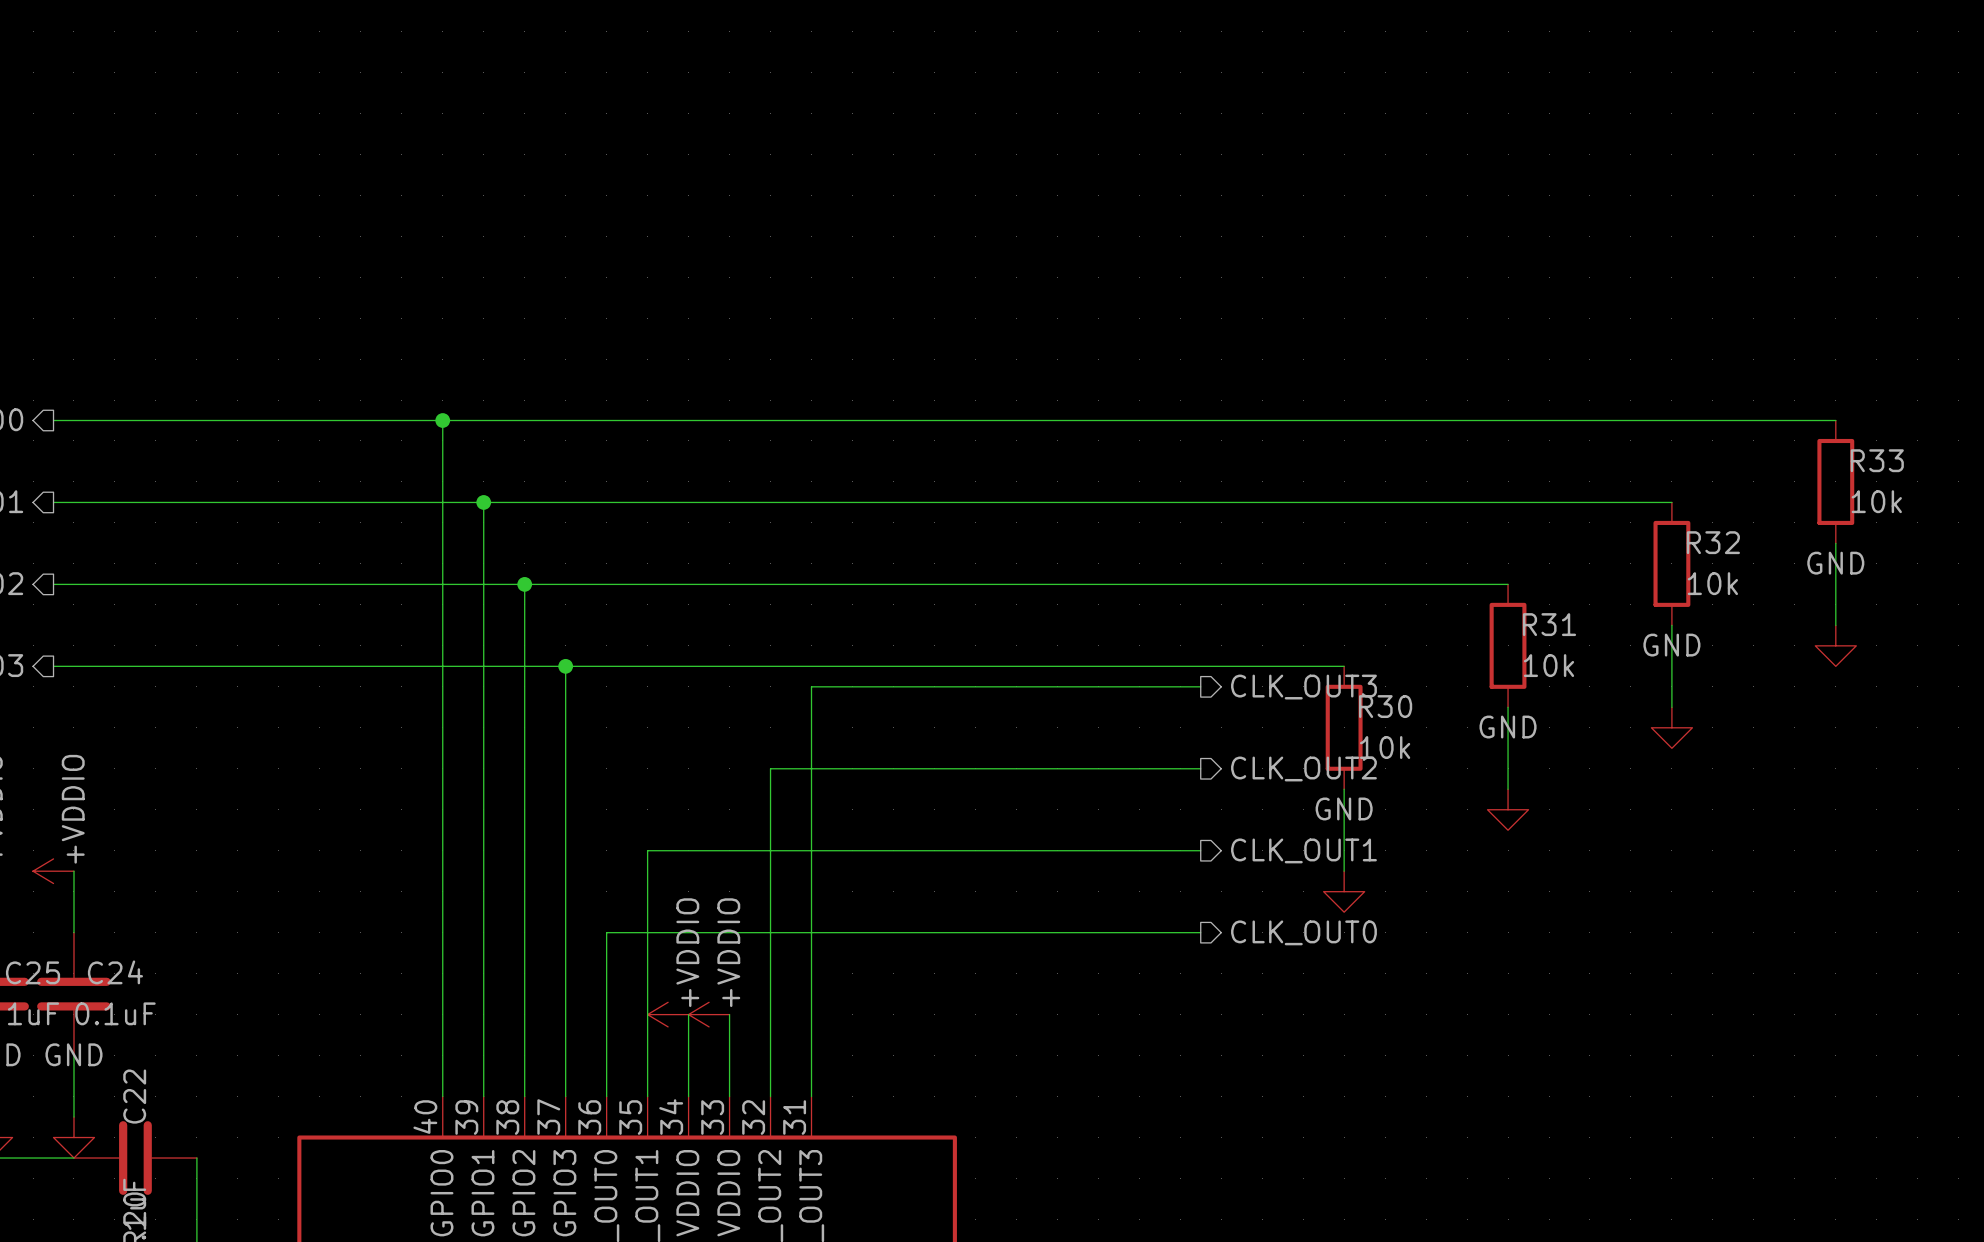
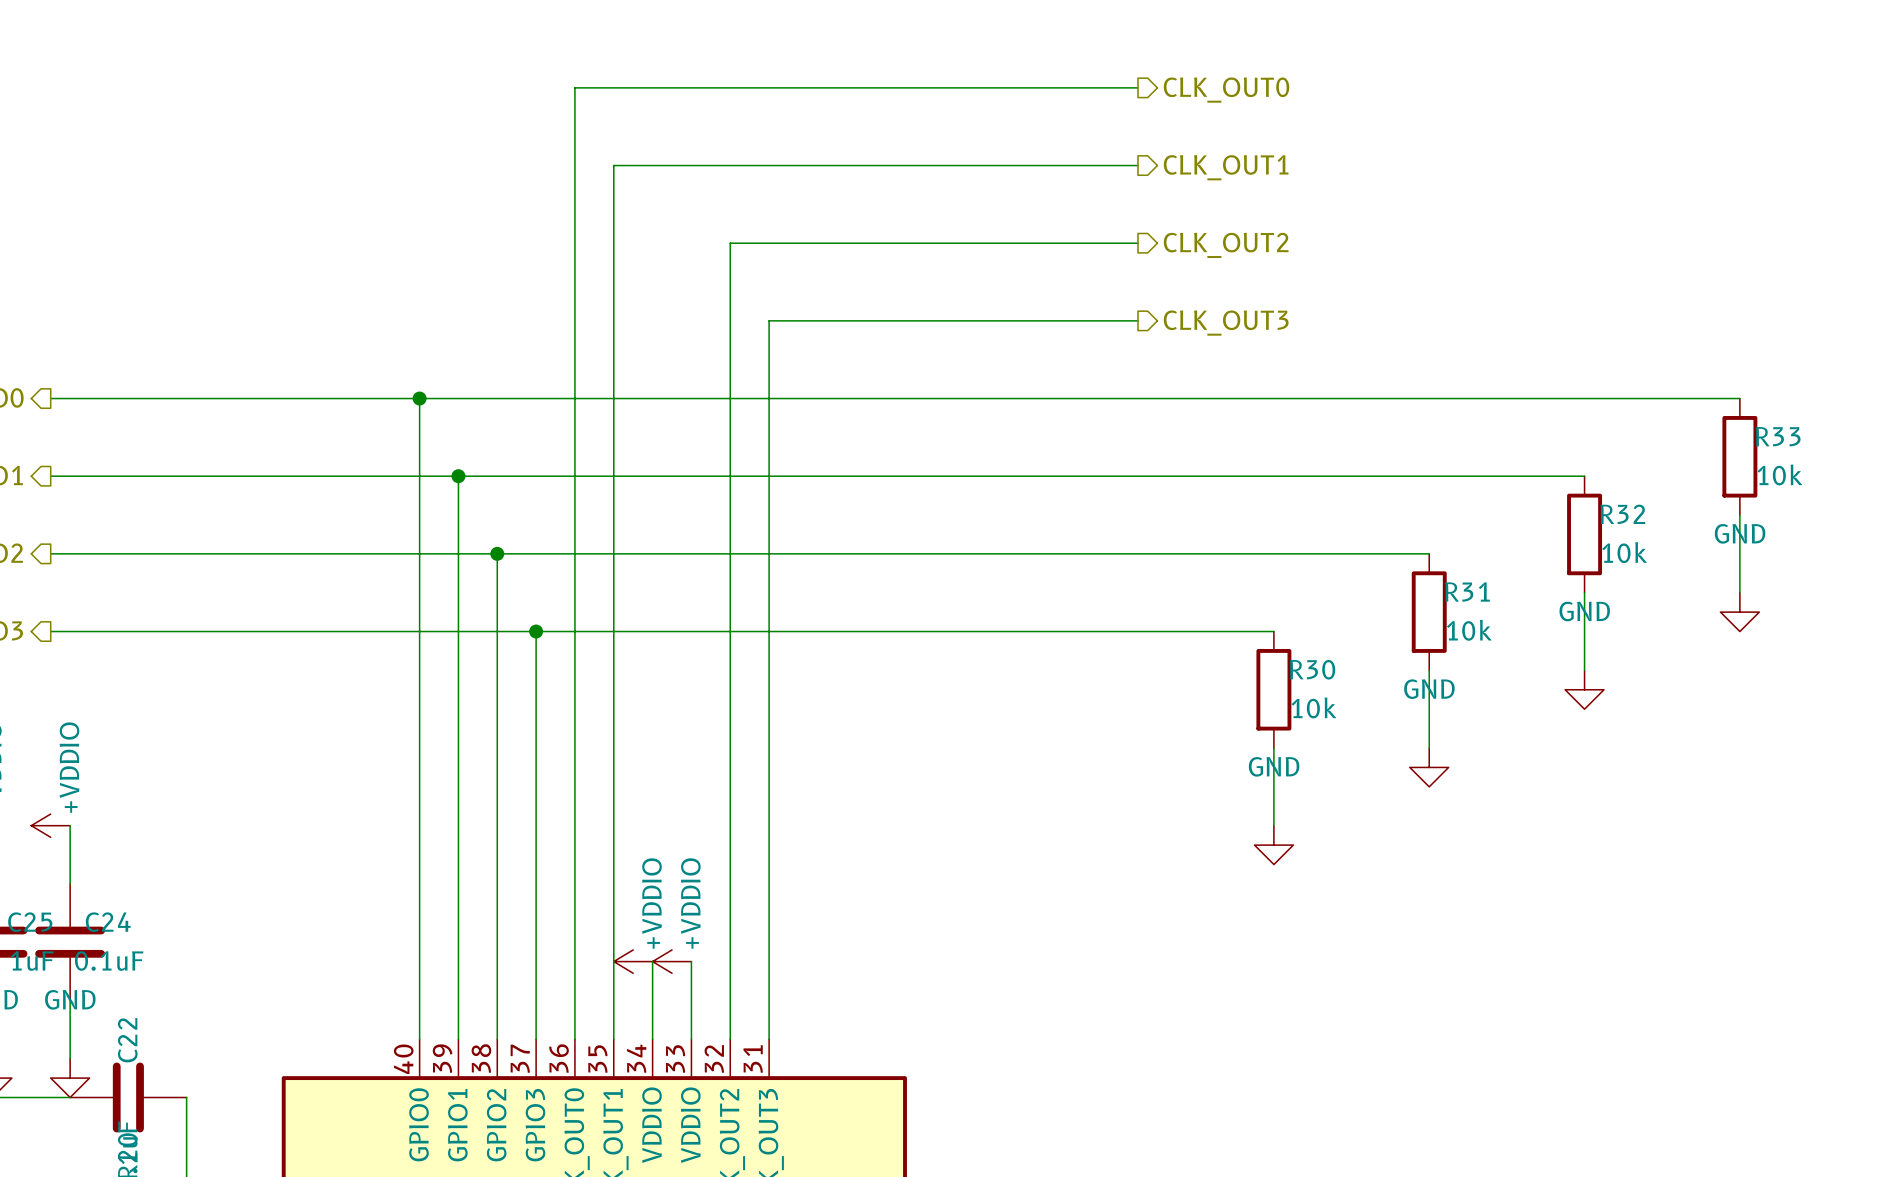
hierarchical label: none -> CLK_OUT0 (1226, 90)
hierarchical label: none -> CLK_OUT1 (1226, 167)
hierarchical label: none -> CLK_OUT2 (1226, 245)
wire: (811, 686) (1200, 686) -> (769, 650) (769, 320) (1137, 320)
hierarchical label position: CLK_OUT3 (1303, 687) -> CLK_OUT3 (1226, 323)
wire: (770, 768) (1200, 768) -> (730, 728) (730, 243) (1137, 243)
hierarchical label: CLK_OUT2 (1303, 768) -> none
wire: (647, 850) (1200, 850) -> (613, 806) (613, 165) (1137, 165)
hierarchical label: CLK_OUT1 (1303, 850) -> none
wire: (606, 932) (1200, 932) -> (574, 883) (574, 87) (1137, 87)
hierarchical label: CLK_OUT0 (1303, 932) -> none

